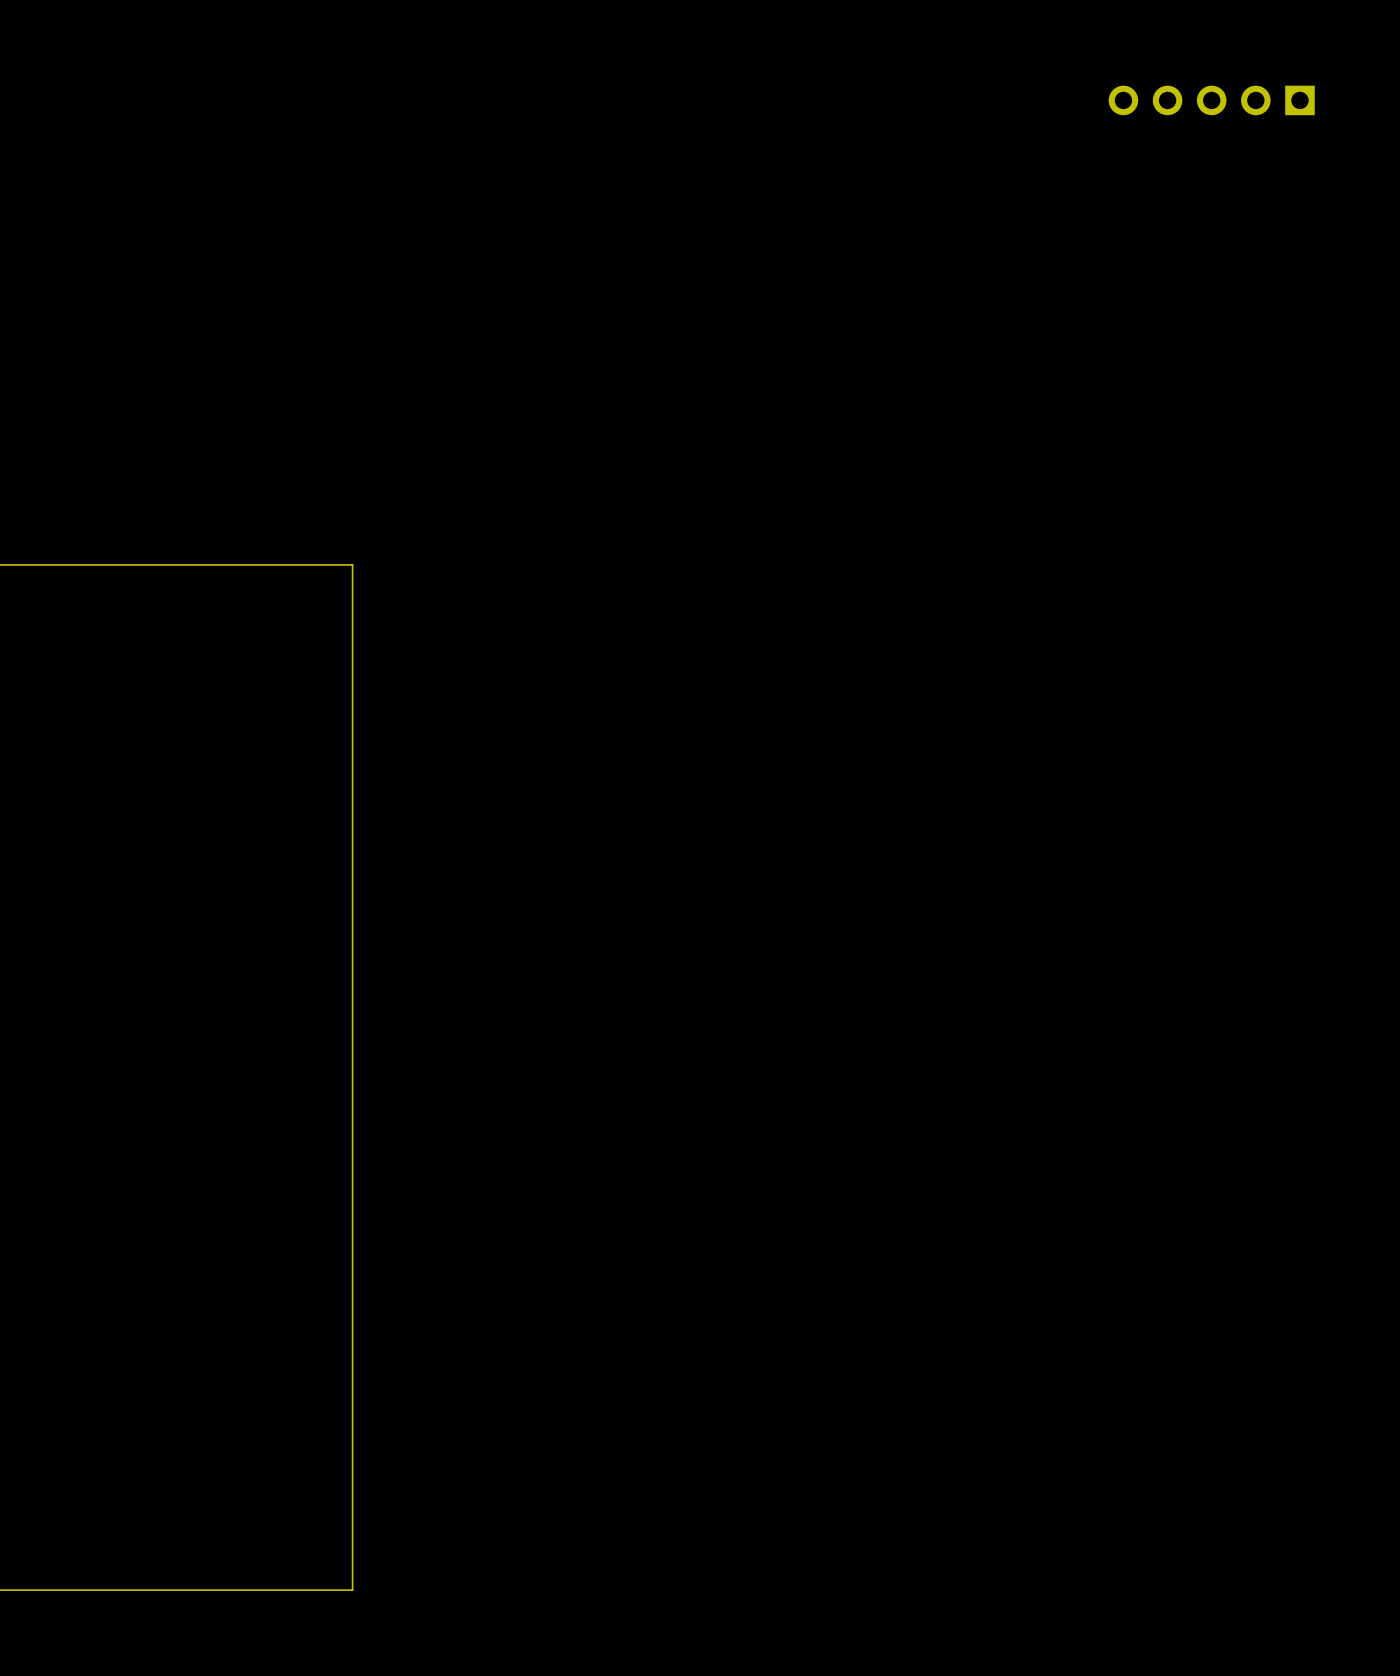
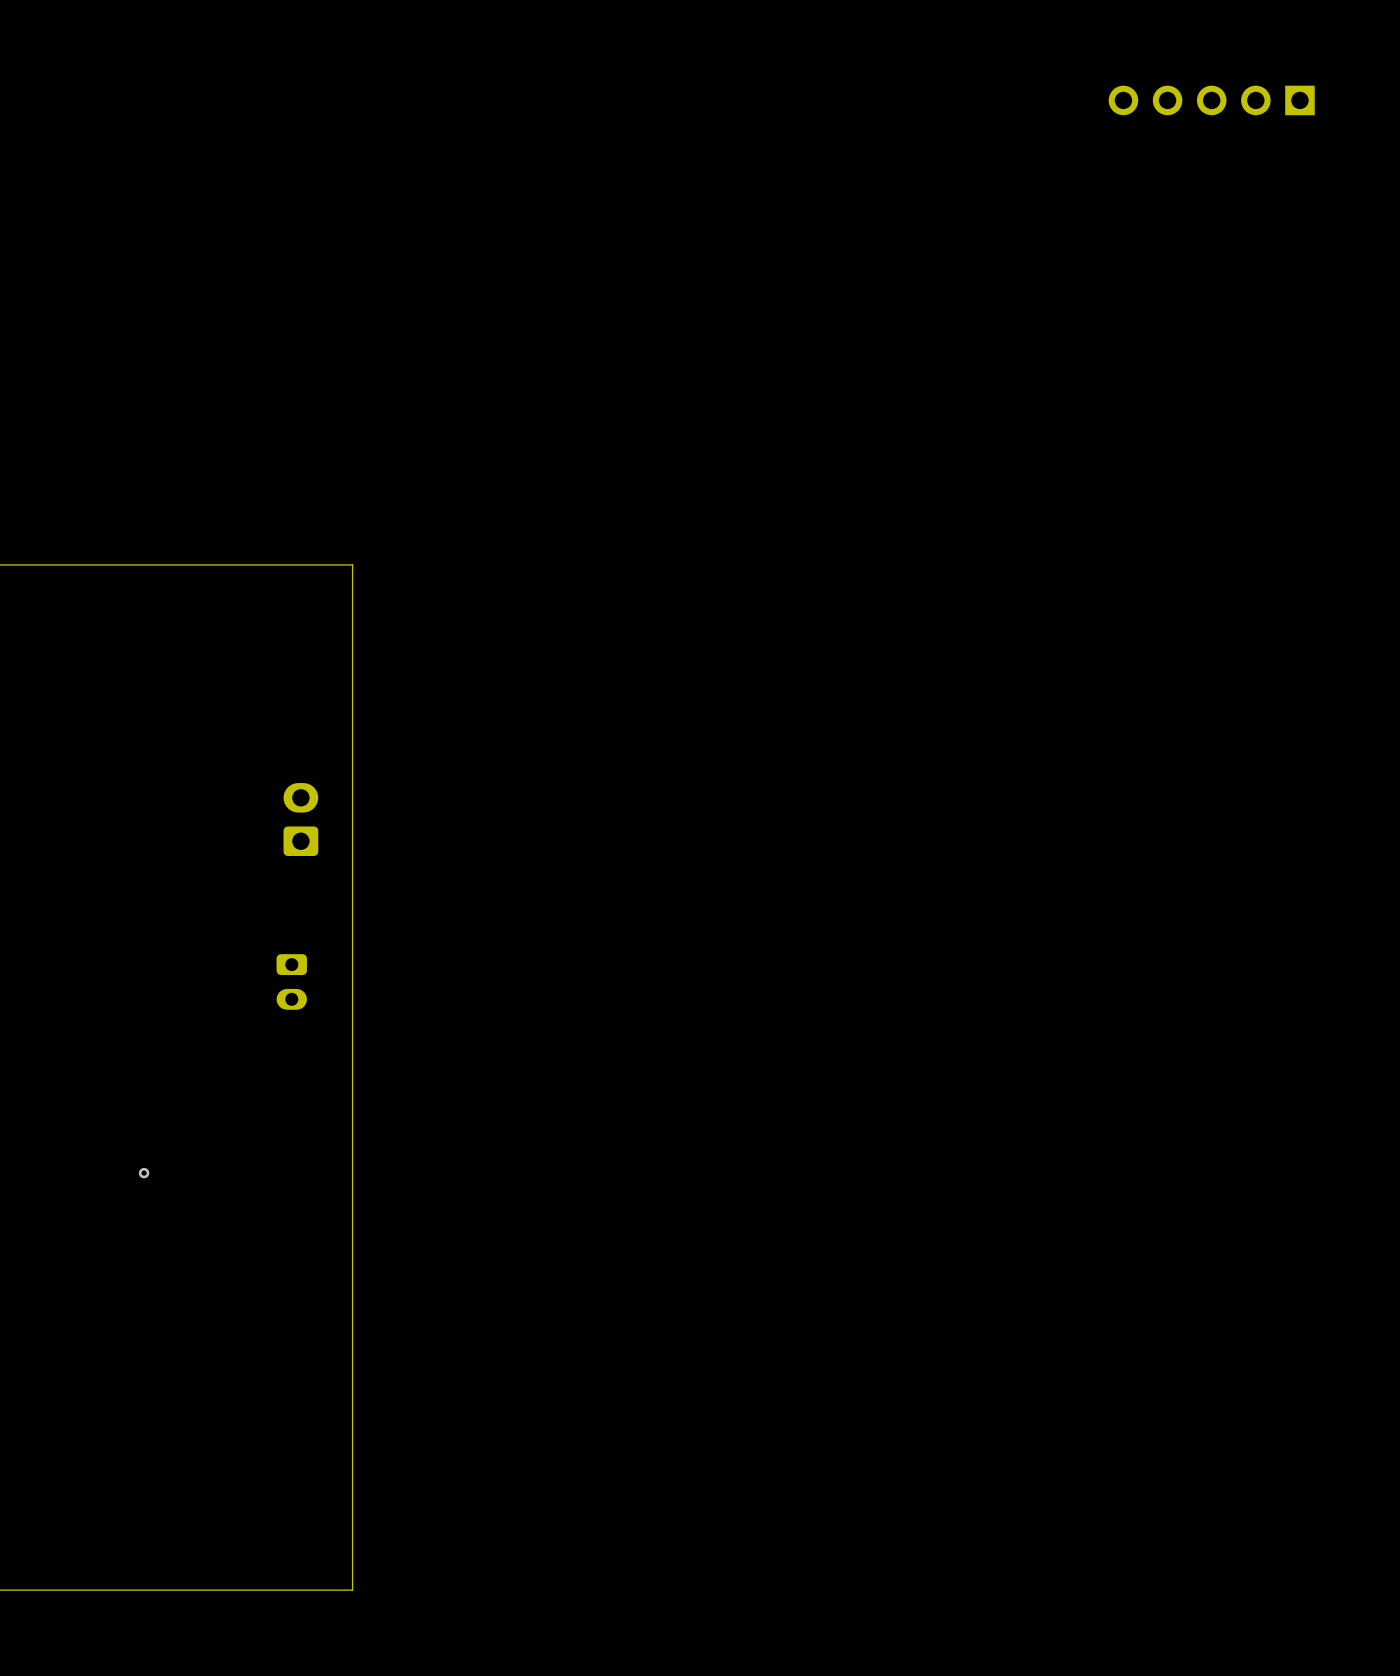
part: none -> (300, 819)
part: none -> (291, 981)
via: none -> (144, 1173)

